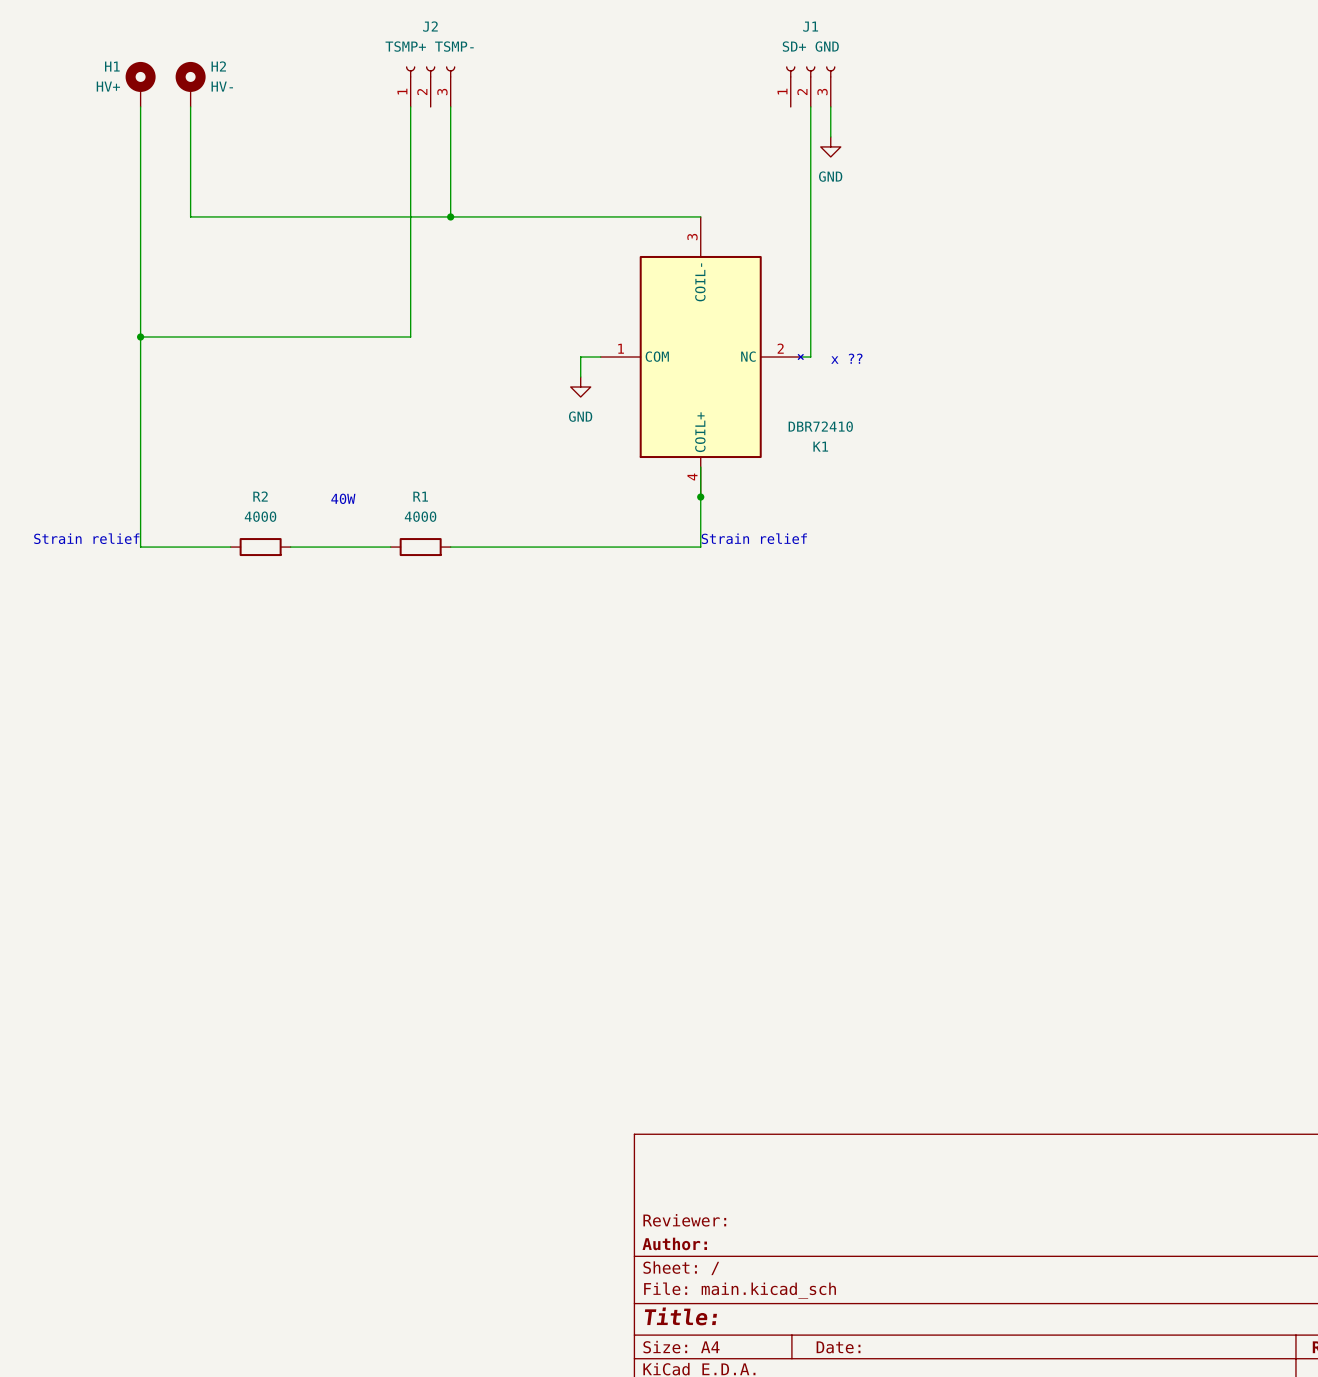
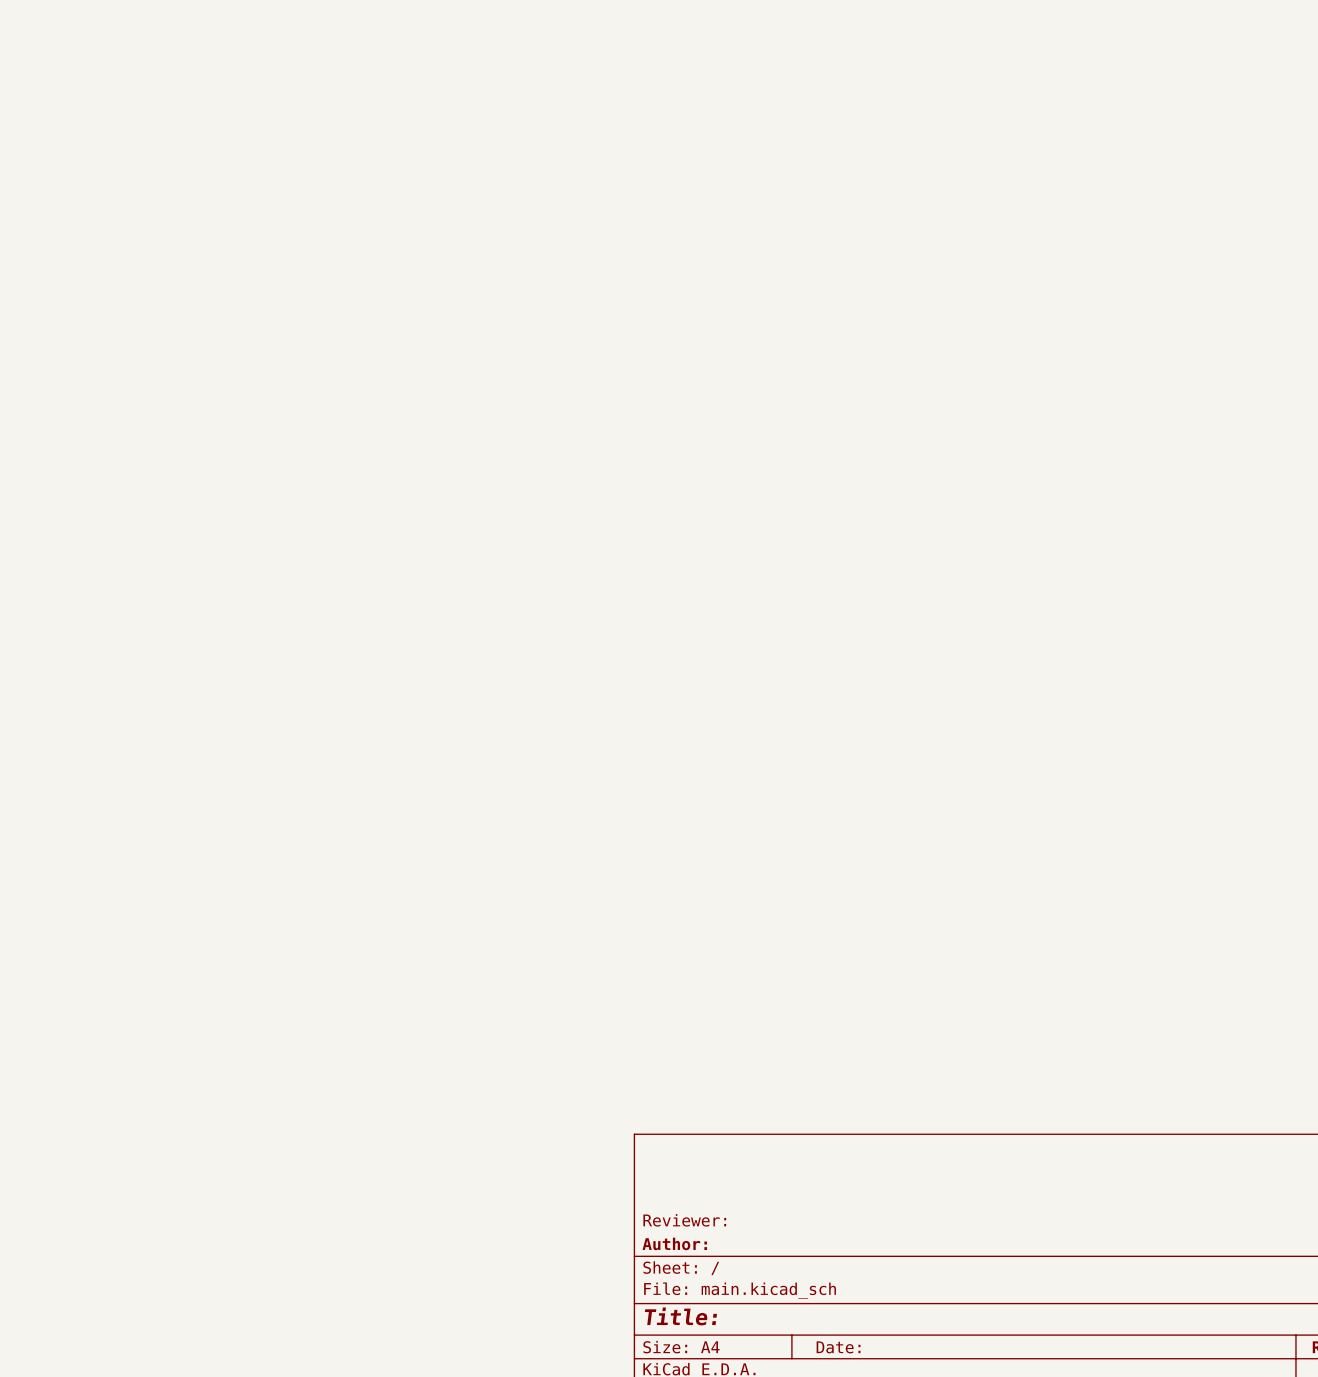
H1: HV+ (140, 84) -> none
H2: HV- (190, 84) -> none
J2: TSMP+ TSMP- (430, 86) -> none
J1: SD+ GND (810, 86) -> none
wire: (140, 106) (140, 547) (230, 547) -> none
wire: (190, 106) (190, 216) (700, 216) -> none
wire: (410, 106) (410, 336) (140, 336) -> none
wire: (450, 106) (450, 216) -> none
wire: (810, 106) (810, 357) (800, 357) -> none
wire: (830, 106) (830, 136) -> none
power symbol: GND (830, 146) -> none
junction: (450, 216) -> none
junction: (140, 336) -> none
wire: (600, 357) (580, 357) (580, 377) -> none
K1: DBR72410 (701, 357) -> none
text: x ?? (846, 358) -> none
power symbol: GND (580, 387) -> none
wire: (700, 467) (700, 547) (450, 547) -> none
junction: (700, 497) -> none
text: 40W (343, 498) -> none
text: Strain relief (86, 538) -> none
text: Strain relief (754, 538) -> none
R2: 4000 (260, 547) -> none
wire: (290, 547) (390, 547) -> none
R1: 4000 (420, 547) -> none

